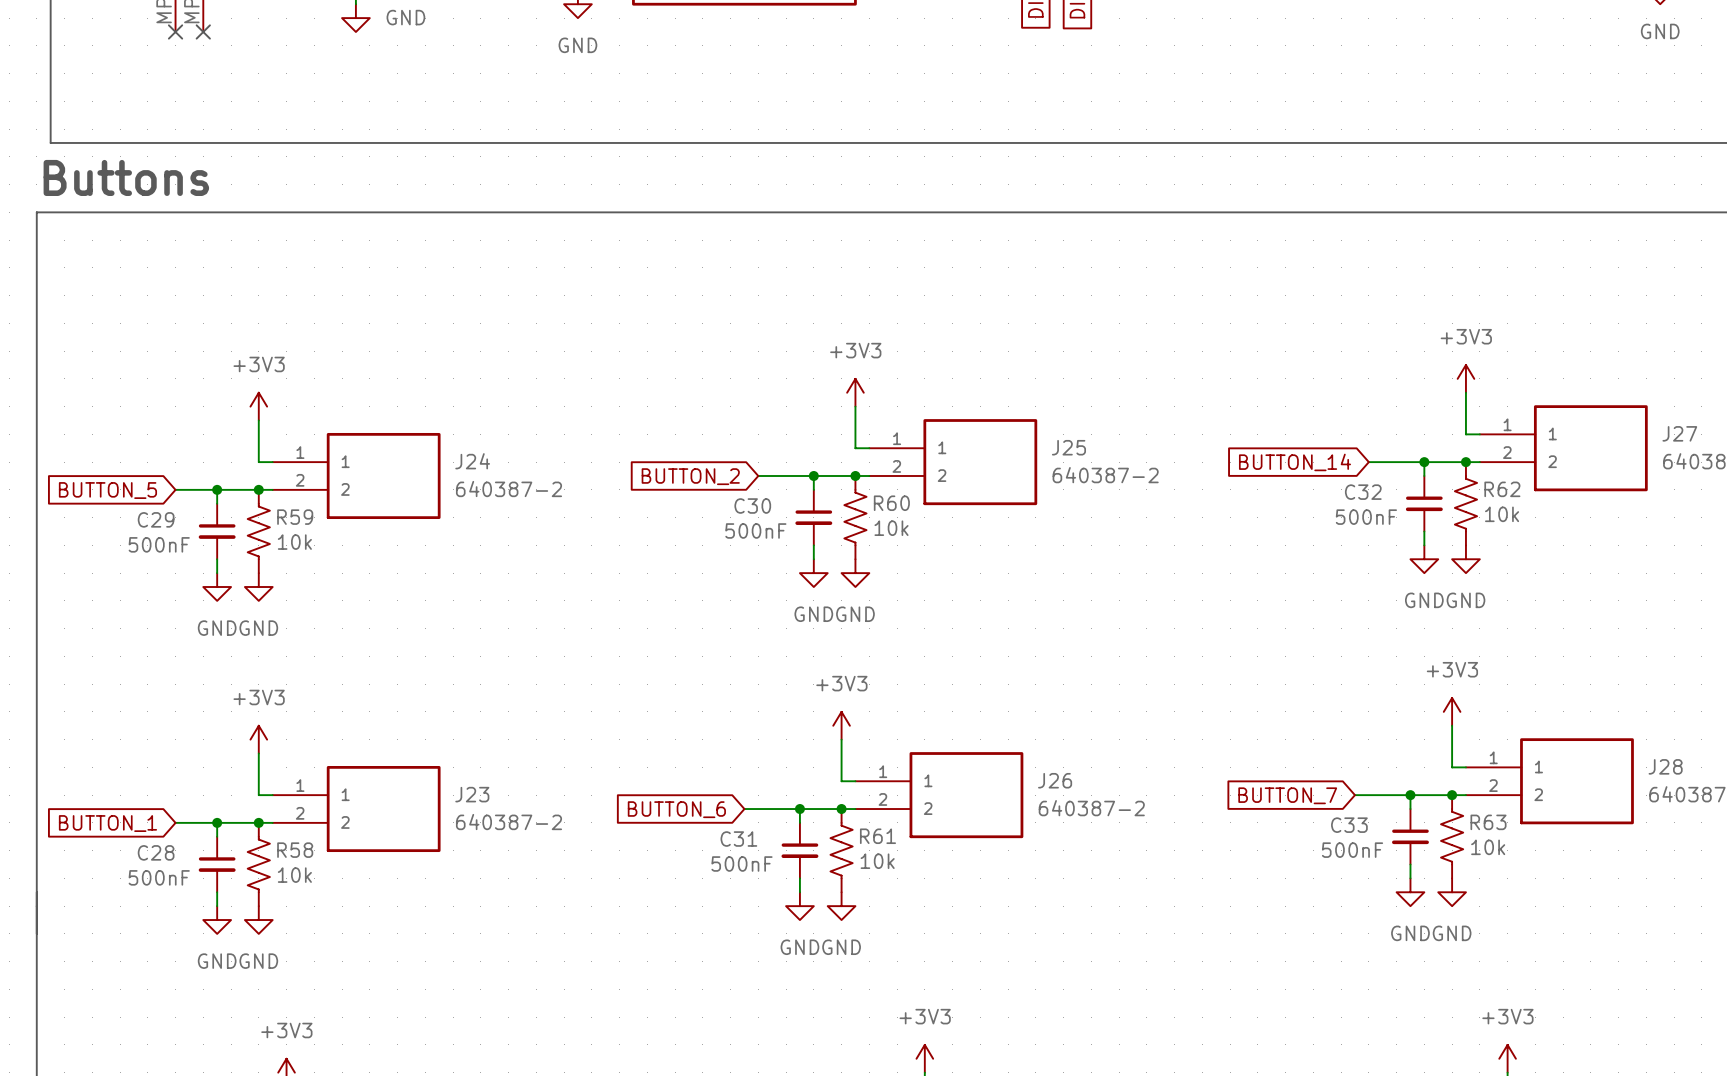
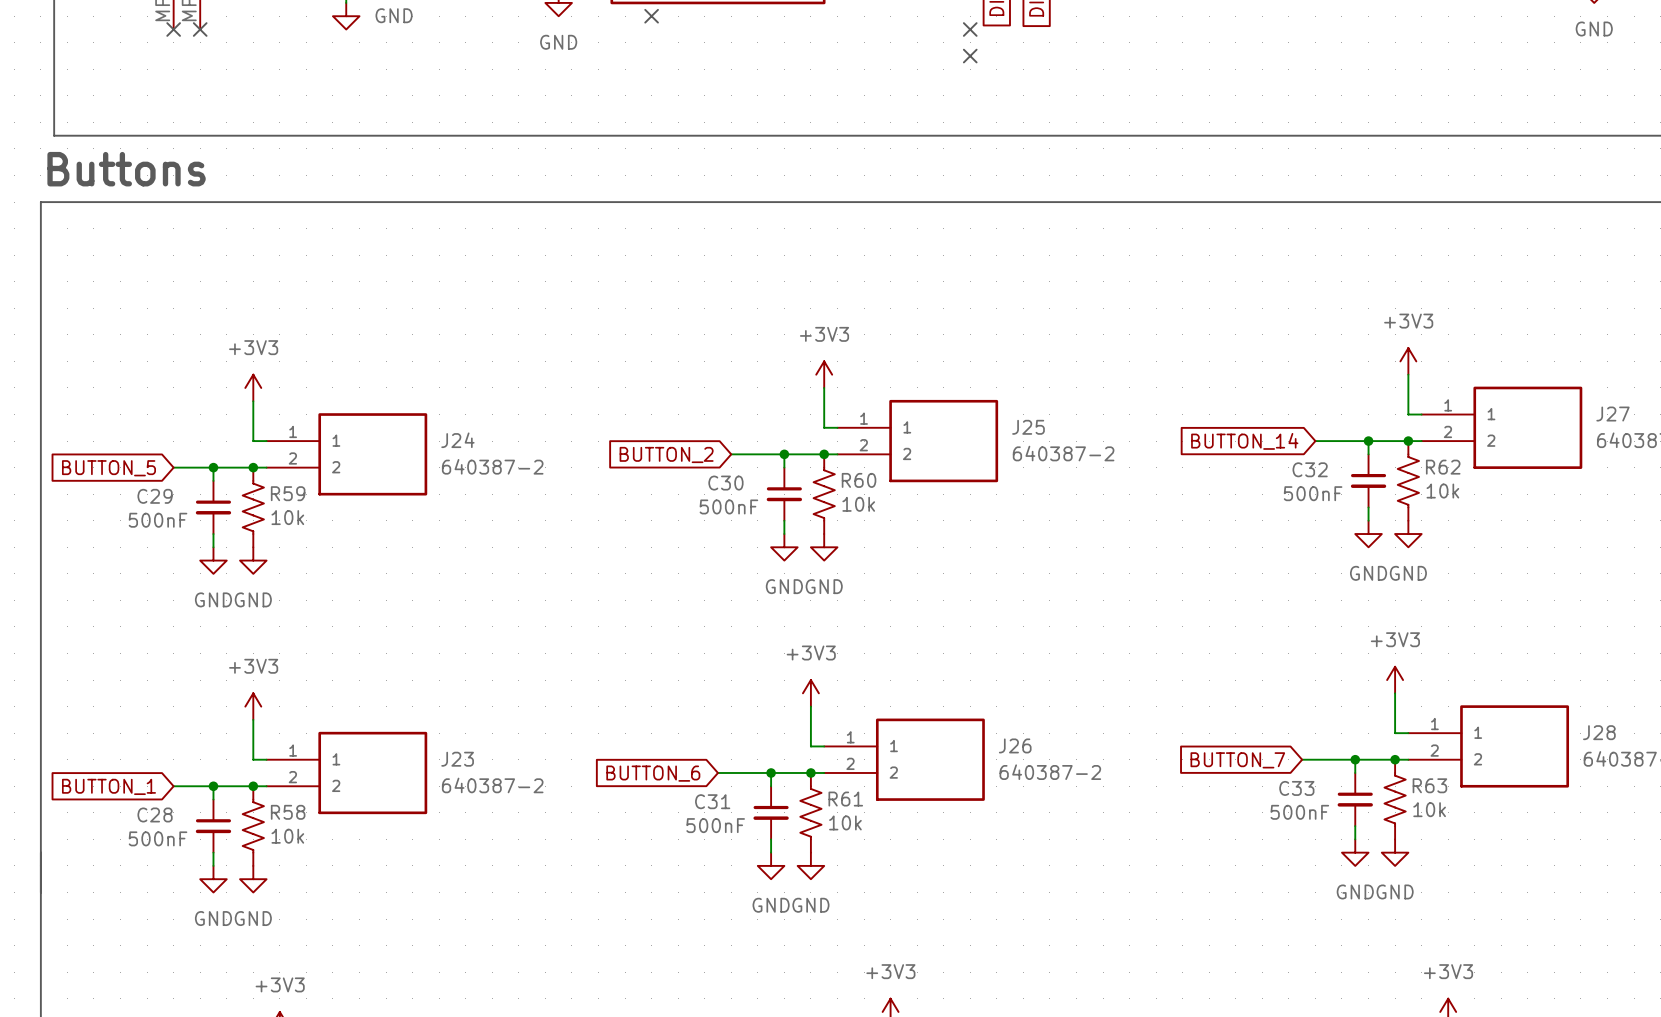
no-connect mark: none -> (651, 16)
no-connect mark: none -> (970, 29)
no-connect mark: none -> (970, 56)

